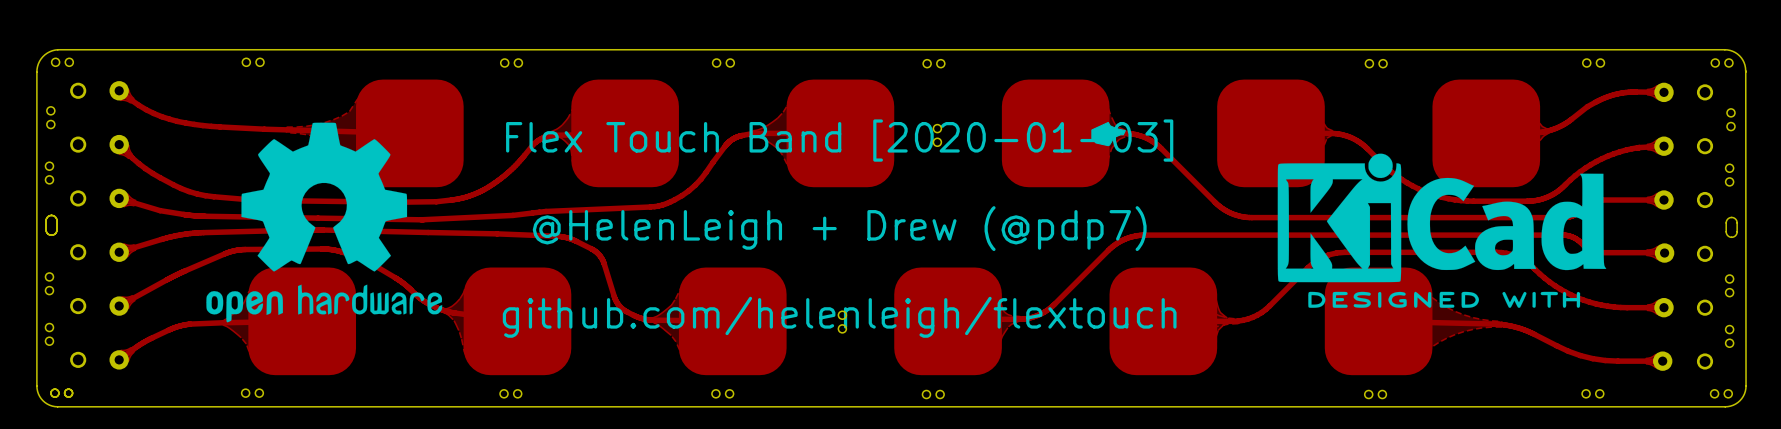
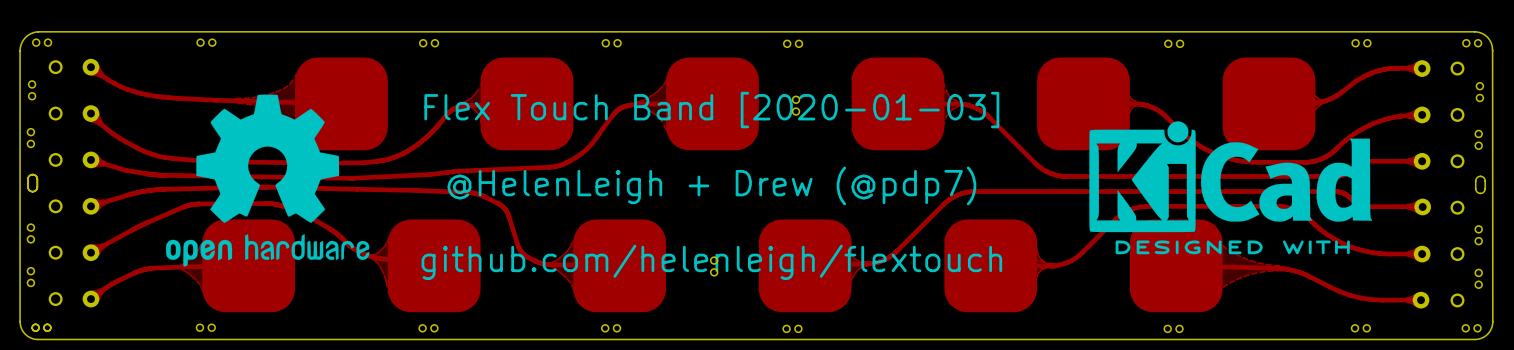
drawing: [1091, 121, 1126, 147] -> none

